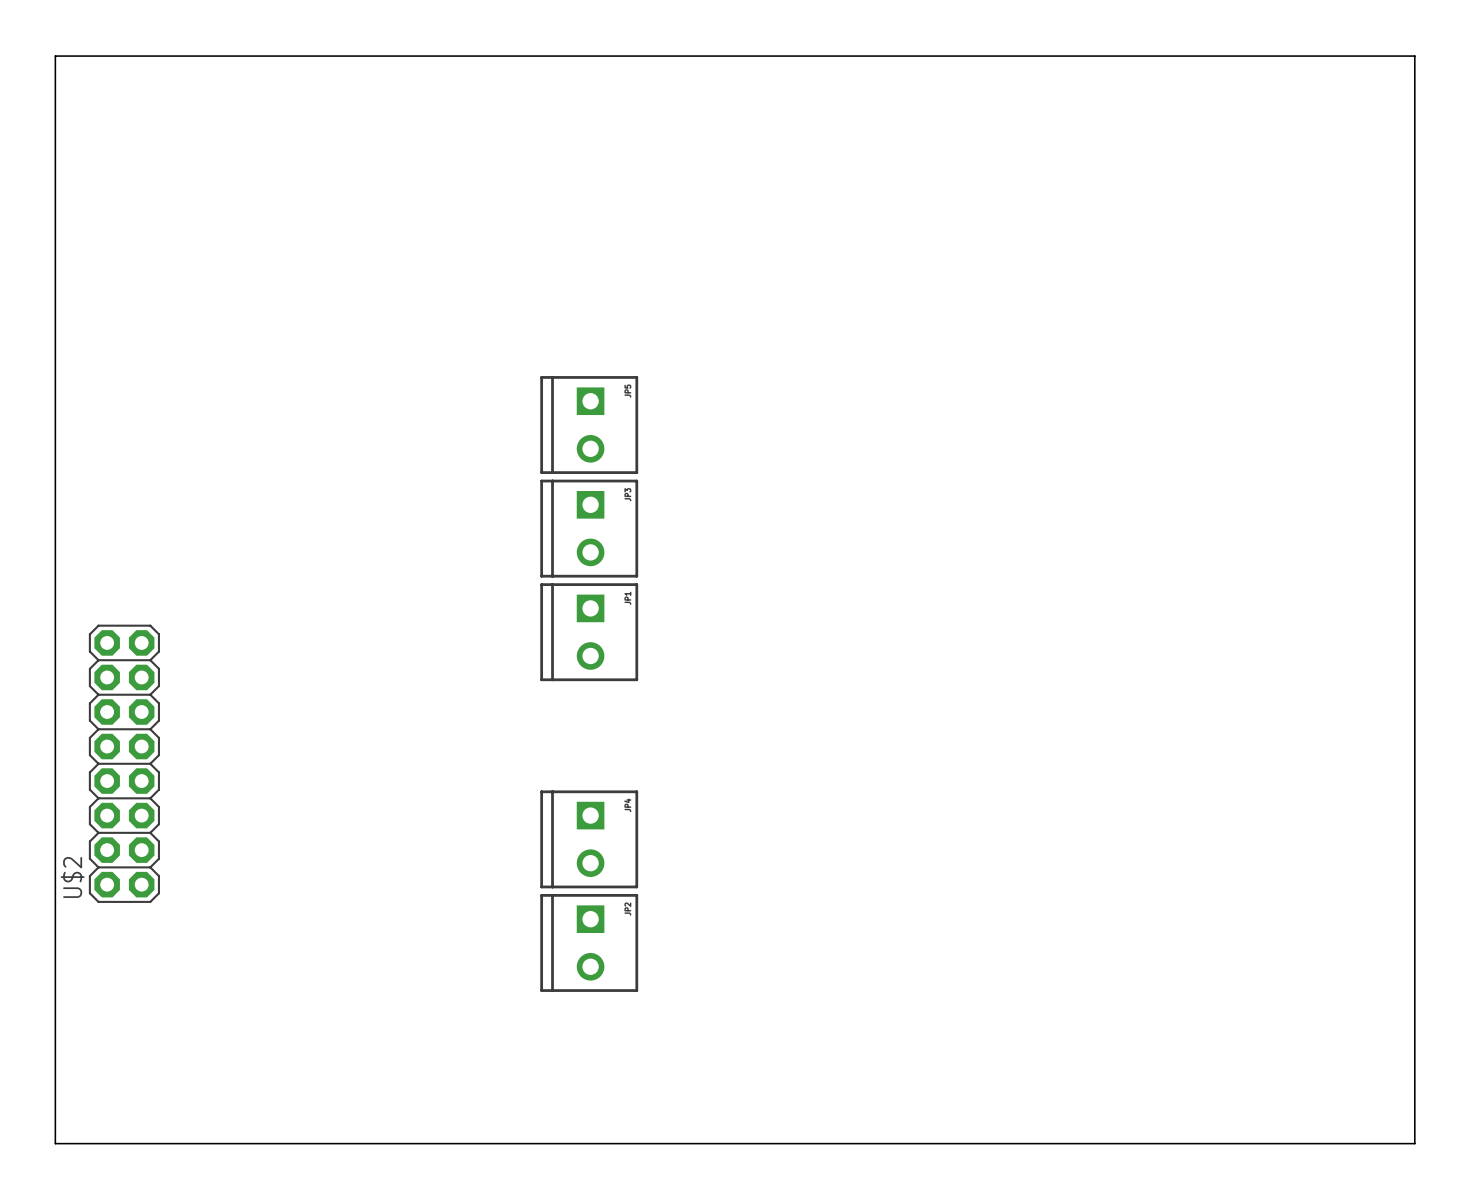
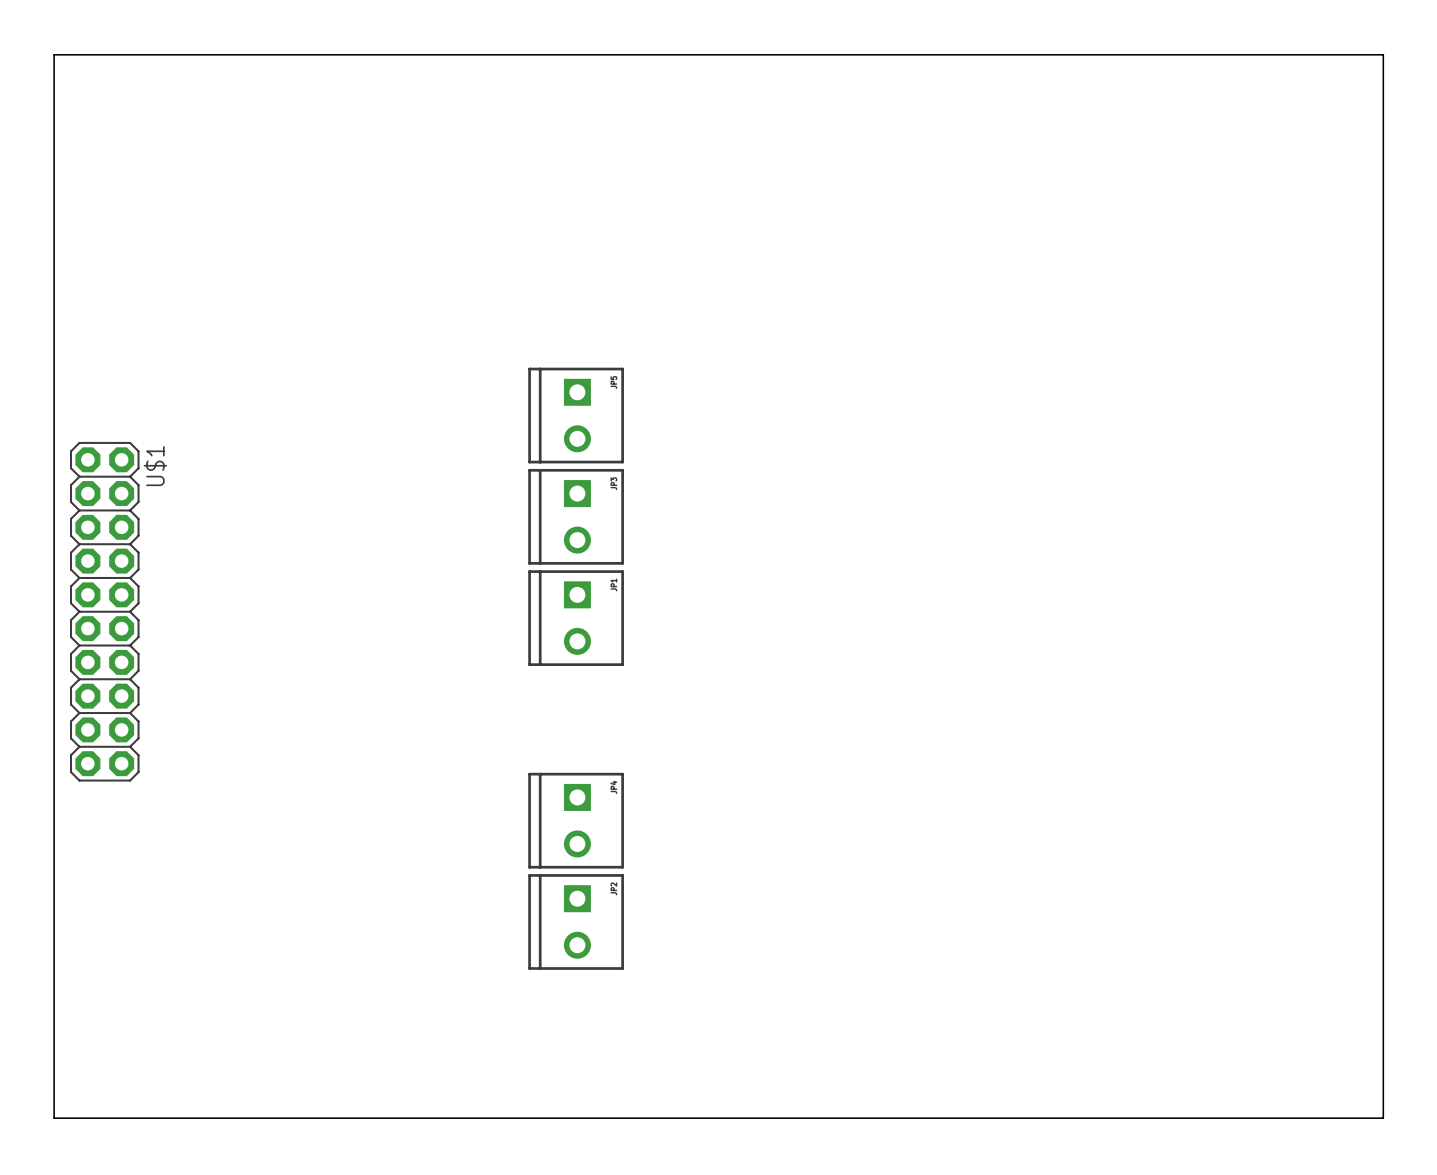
U$1: none -> (104, 611)
U$2: (124, 763) -> none

